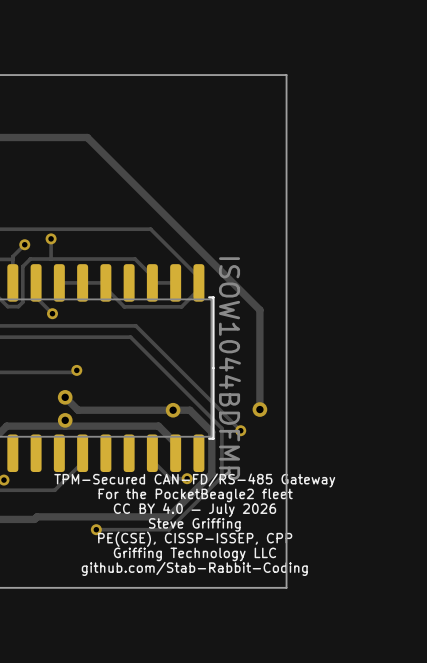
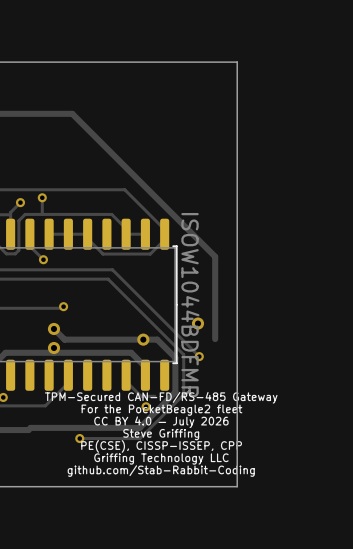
via position: (259, 409) -> (198, 323)
via position: (187, 478) -> (146, 406)

